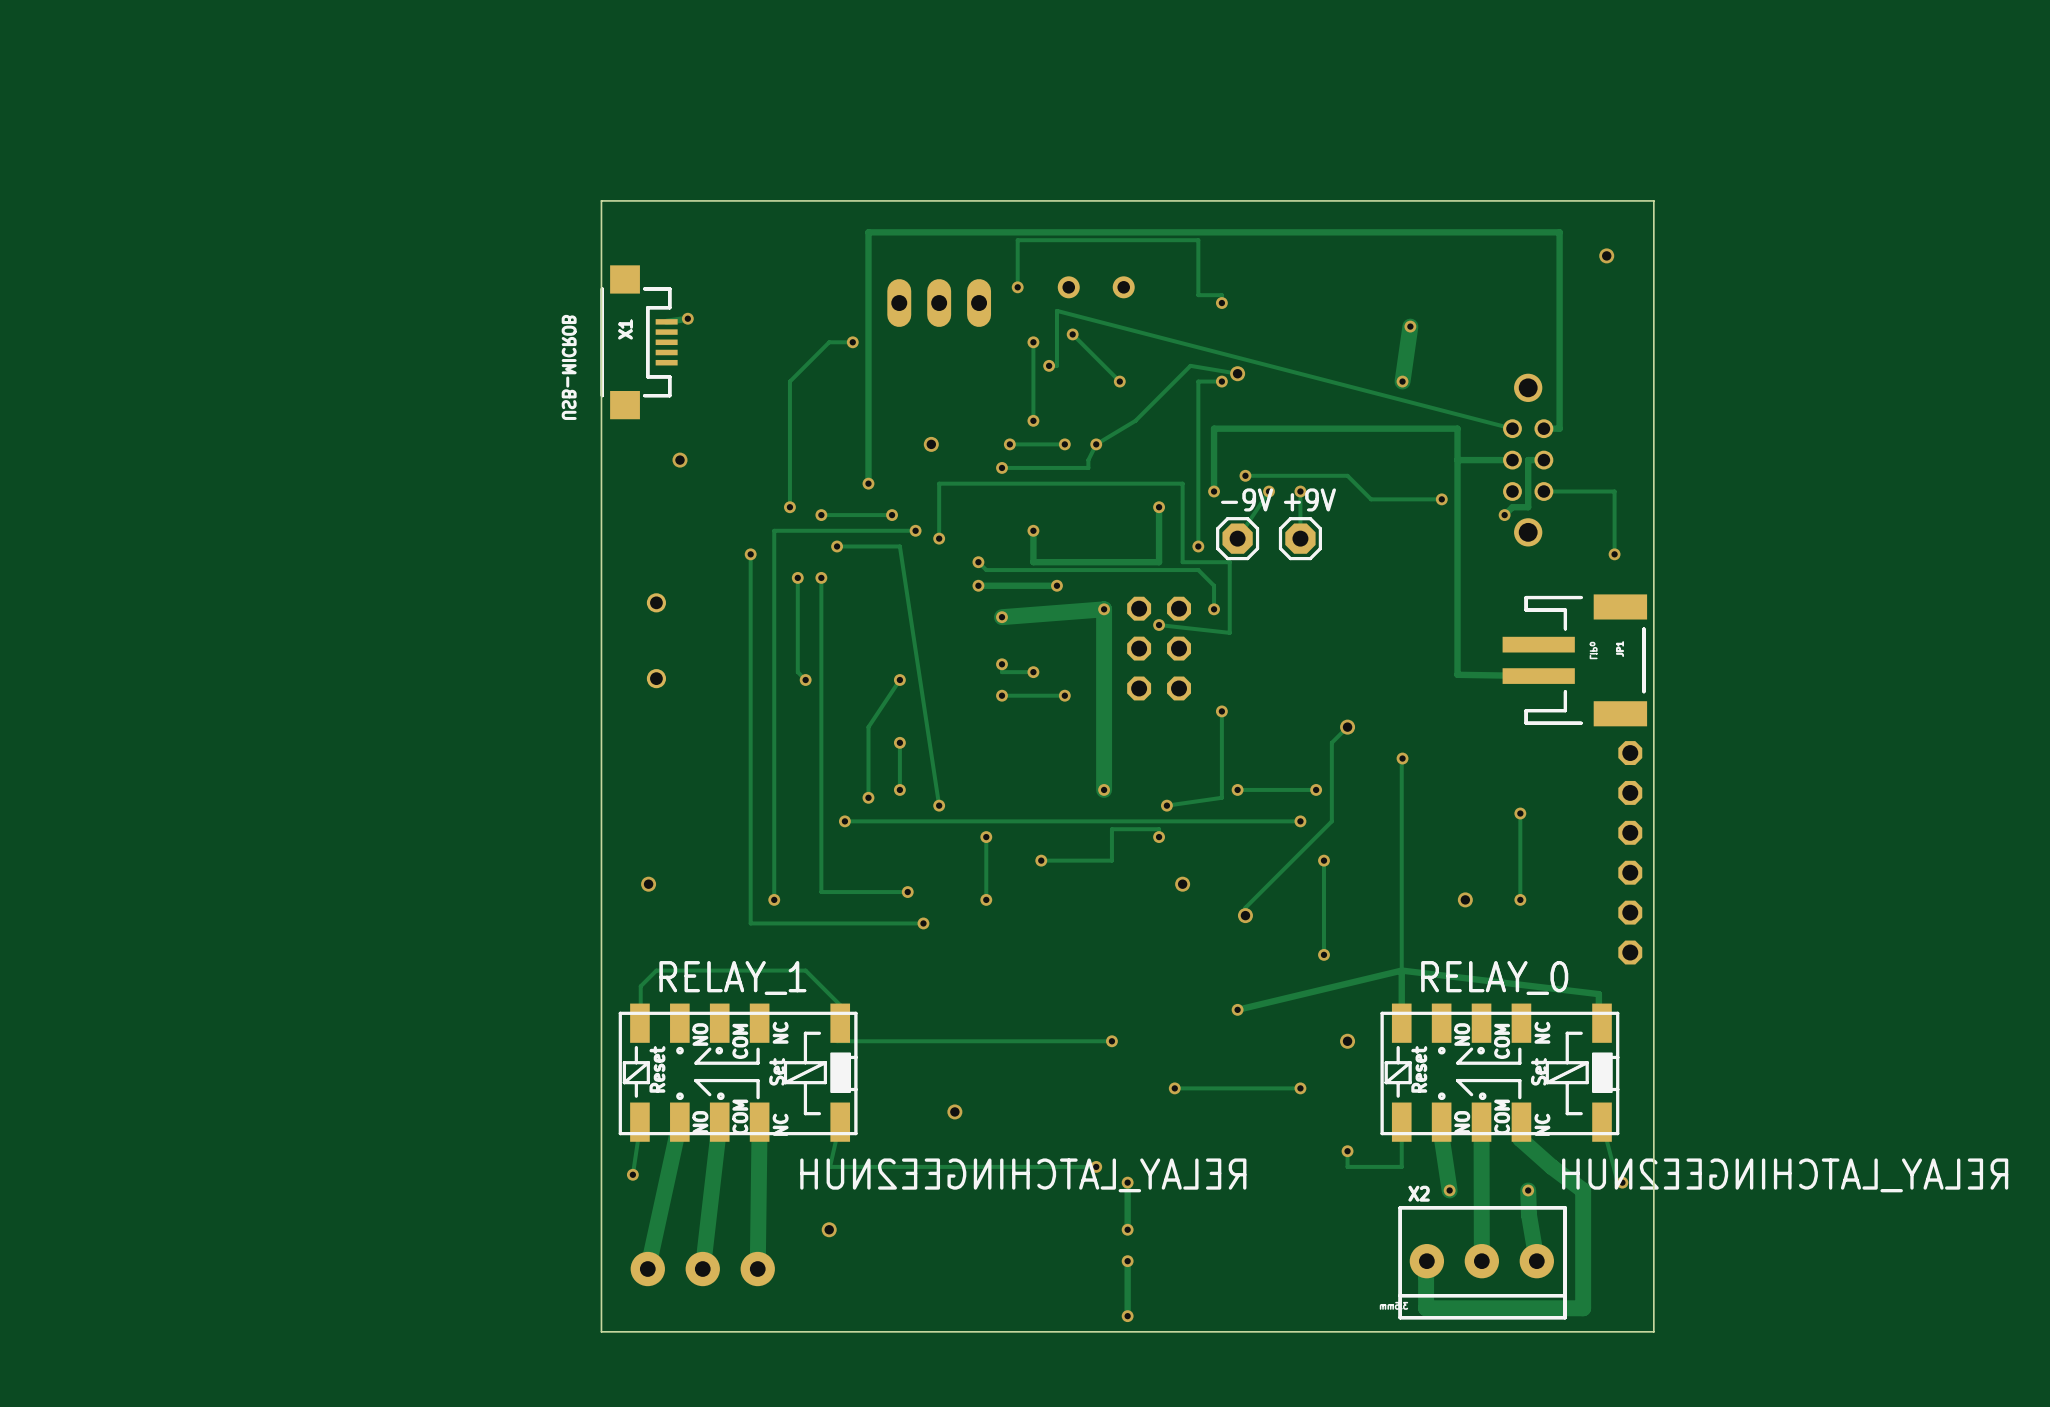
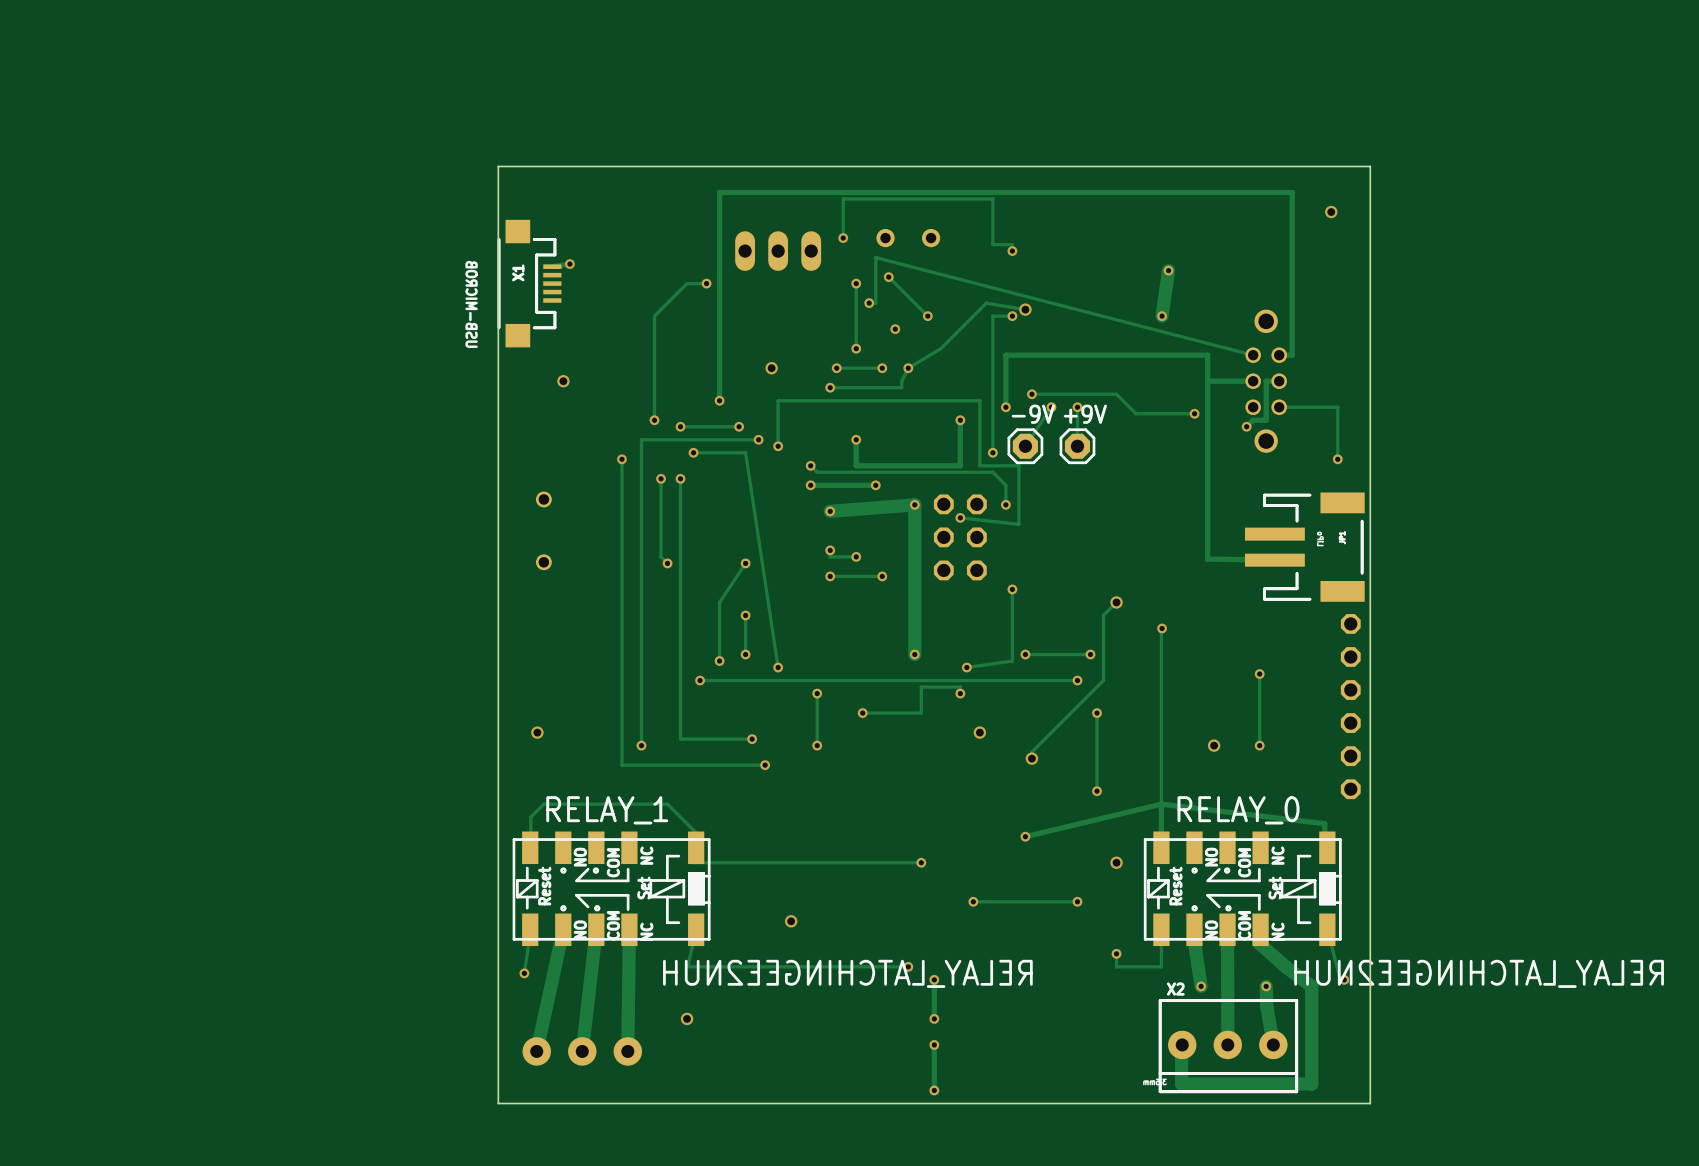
via: none -> (895, 329)

